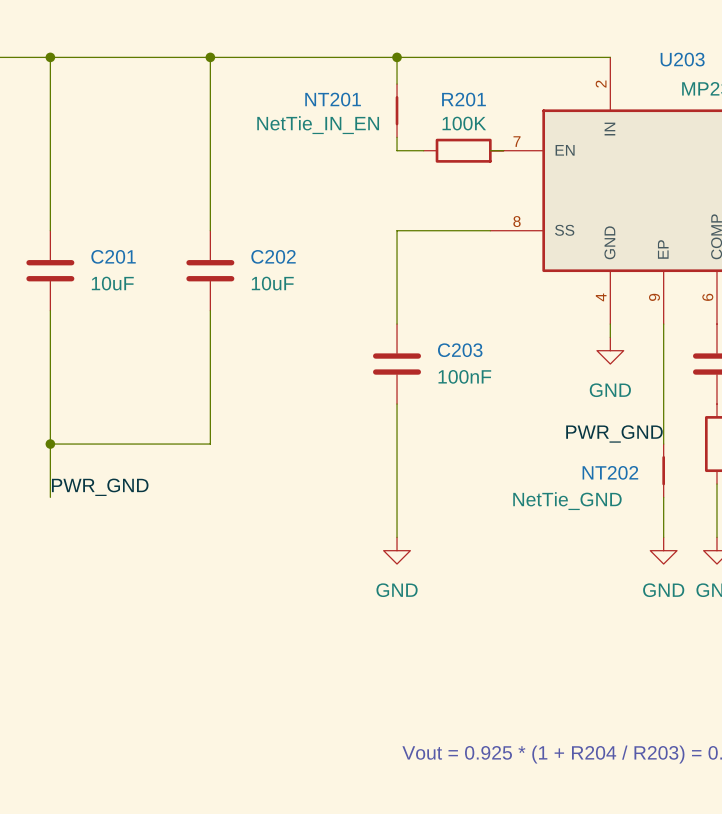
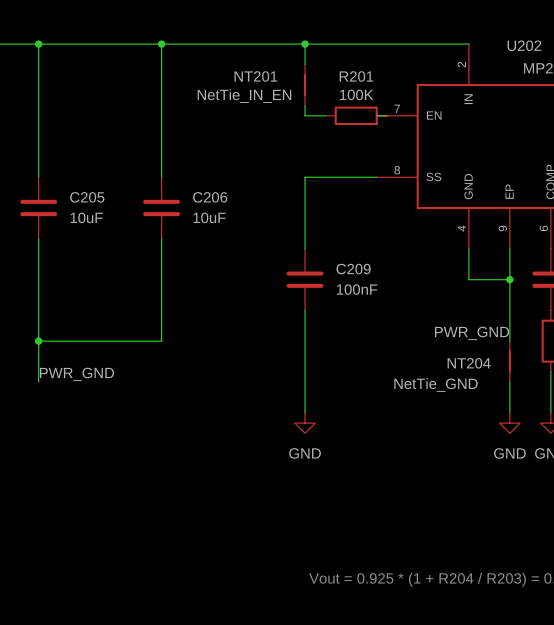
U203 name: U203 (682, 59) -> U202 (524, 45)
C201 name: C201 (113, 256) -> C205 (87, 197)
C202 name: C202 (273, 256) -> C206 (210, 197)
wire: none -> (468, 259) (468, 279) (509, 279)
C203 name: C203 (460, 350) -> C209 (353, 269)
power symbol: GND (610, 350) -> none
junction: none -> (509, 279)
NT202 name: NT202 (610, 472) -> NT204 (469, 363)

